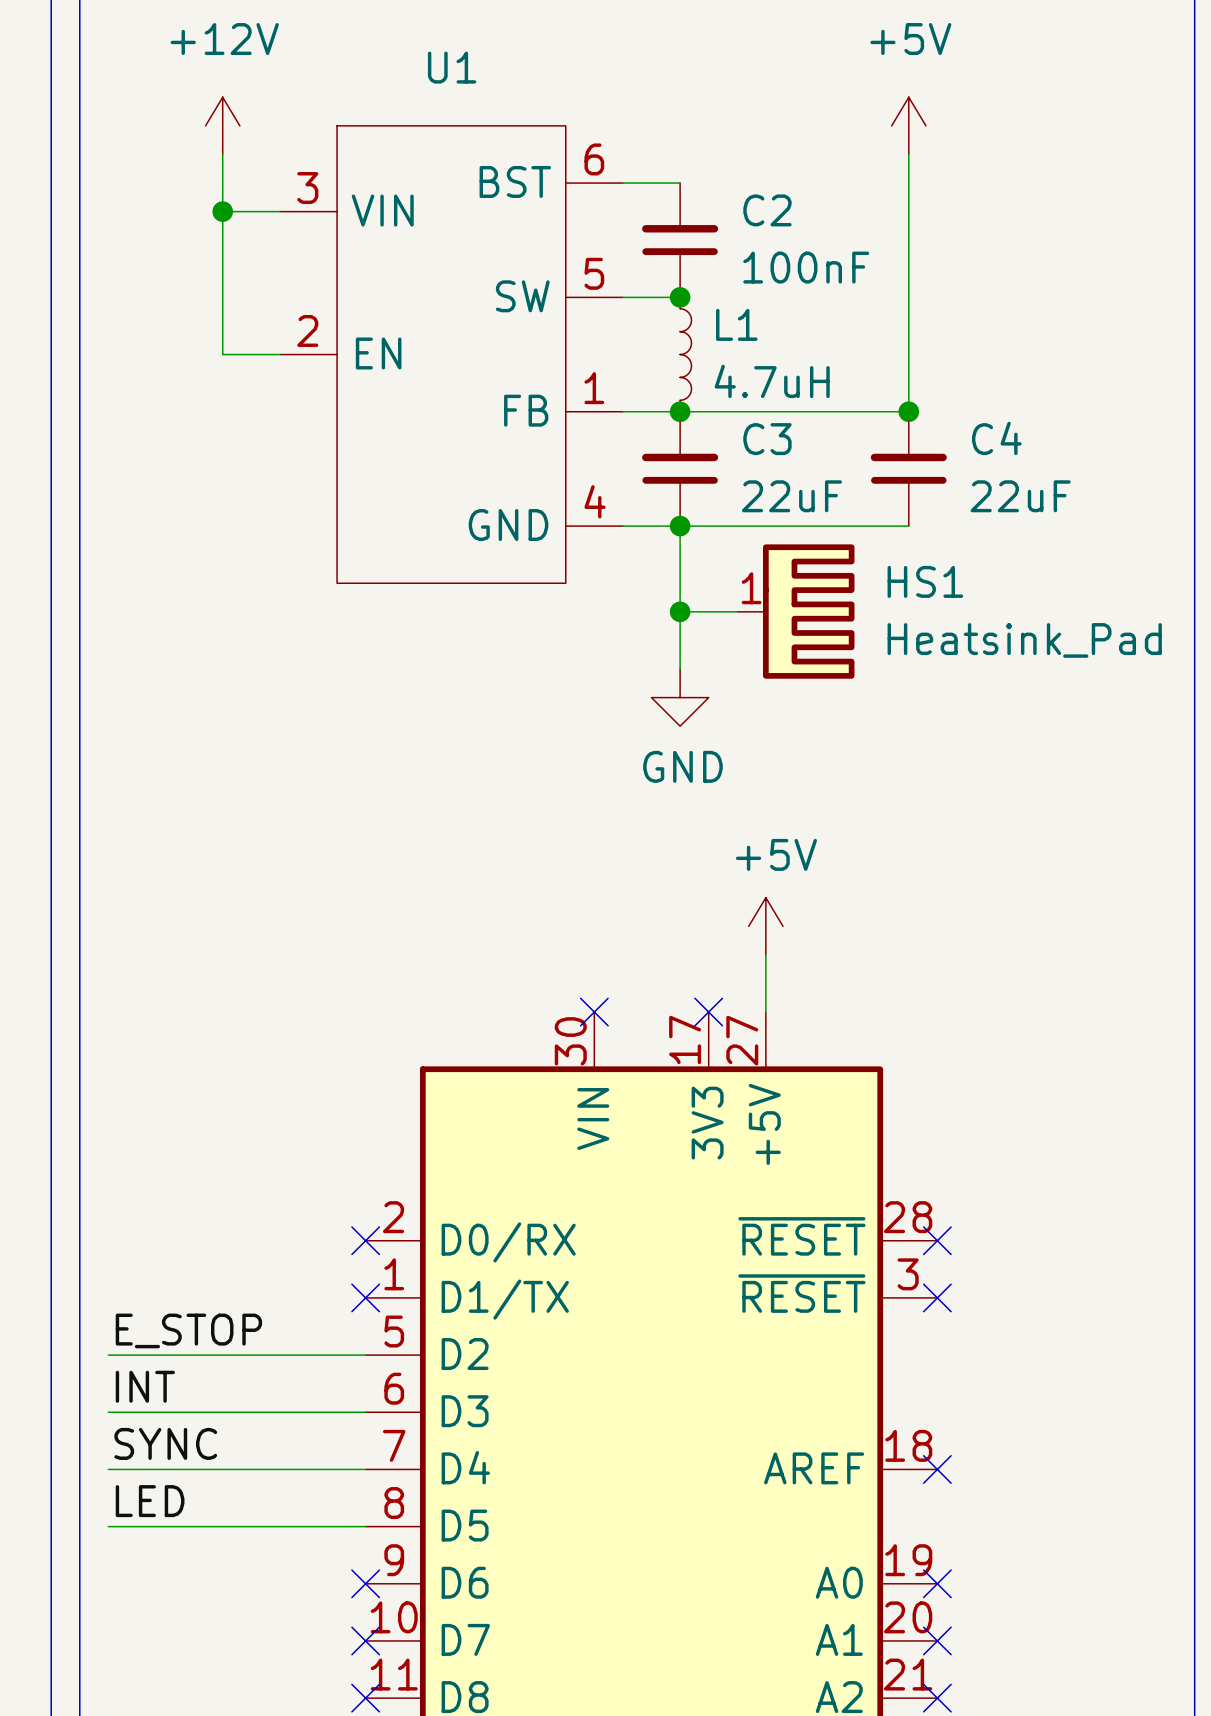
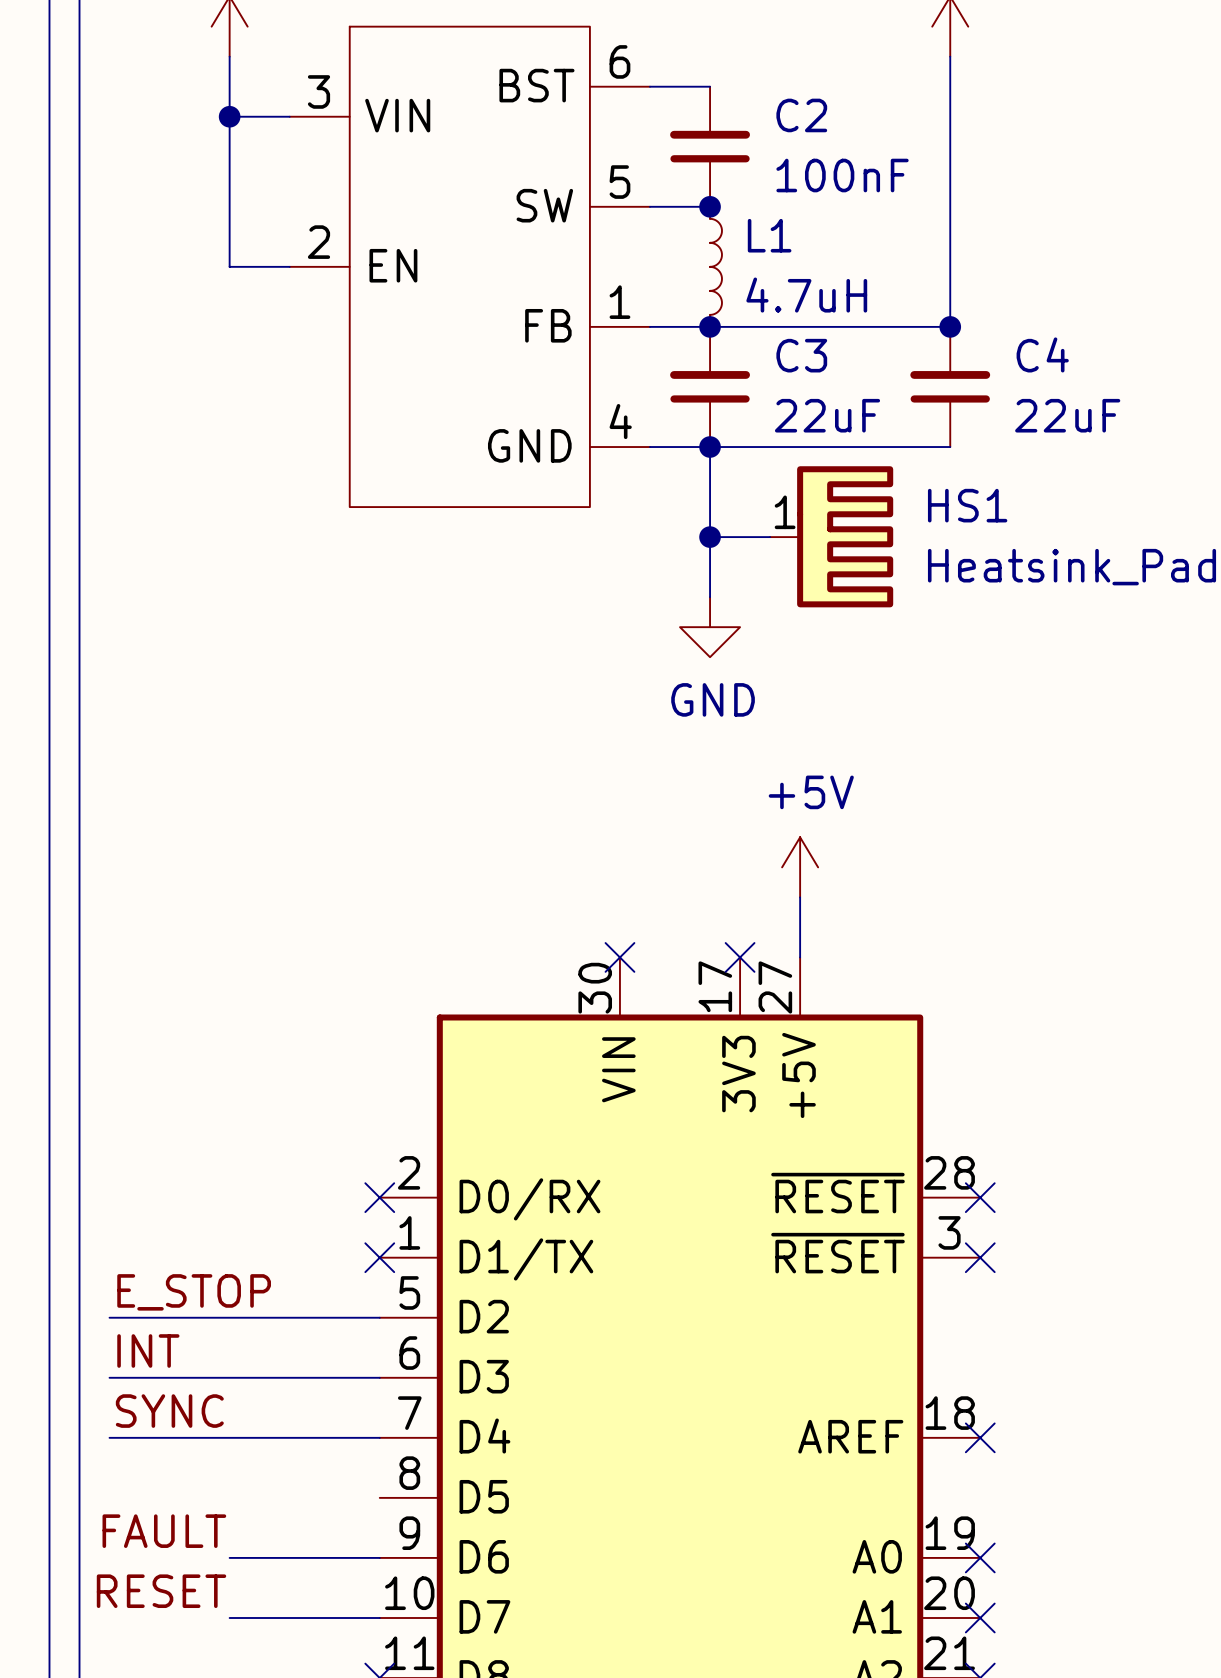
label: LED (150, 1501) -> none
wire: (108, 1526) (365, 1526) -> none
label: none -> FAULT (164, 1531)
wire: none -> (229, 1557) (379, 1557)
no-connect mark: (365, 1583) -> none
label: none -> RESET (161, 1591)
wire: none -> (229, 1617) (379, 1617)
no-connect mark: (365, 1640) -> none

